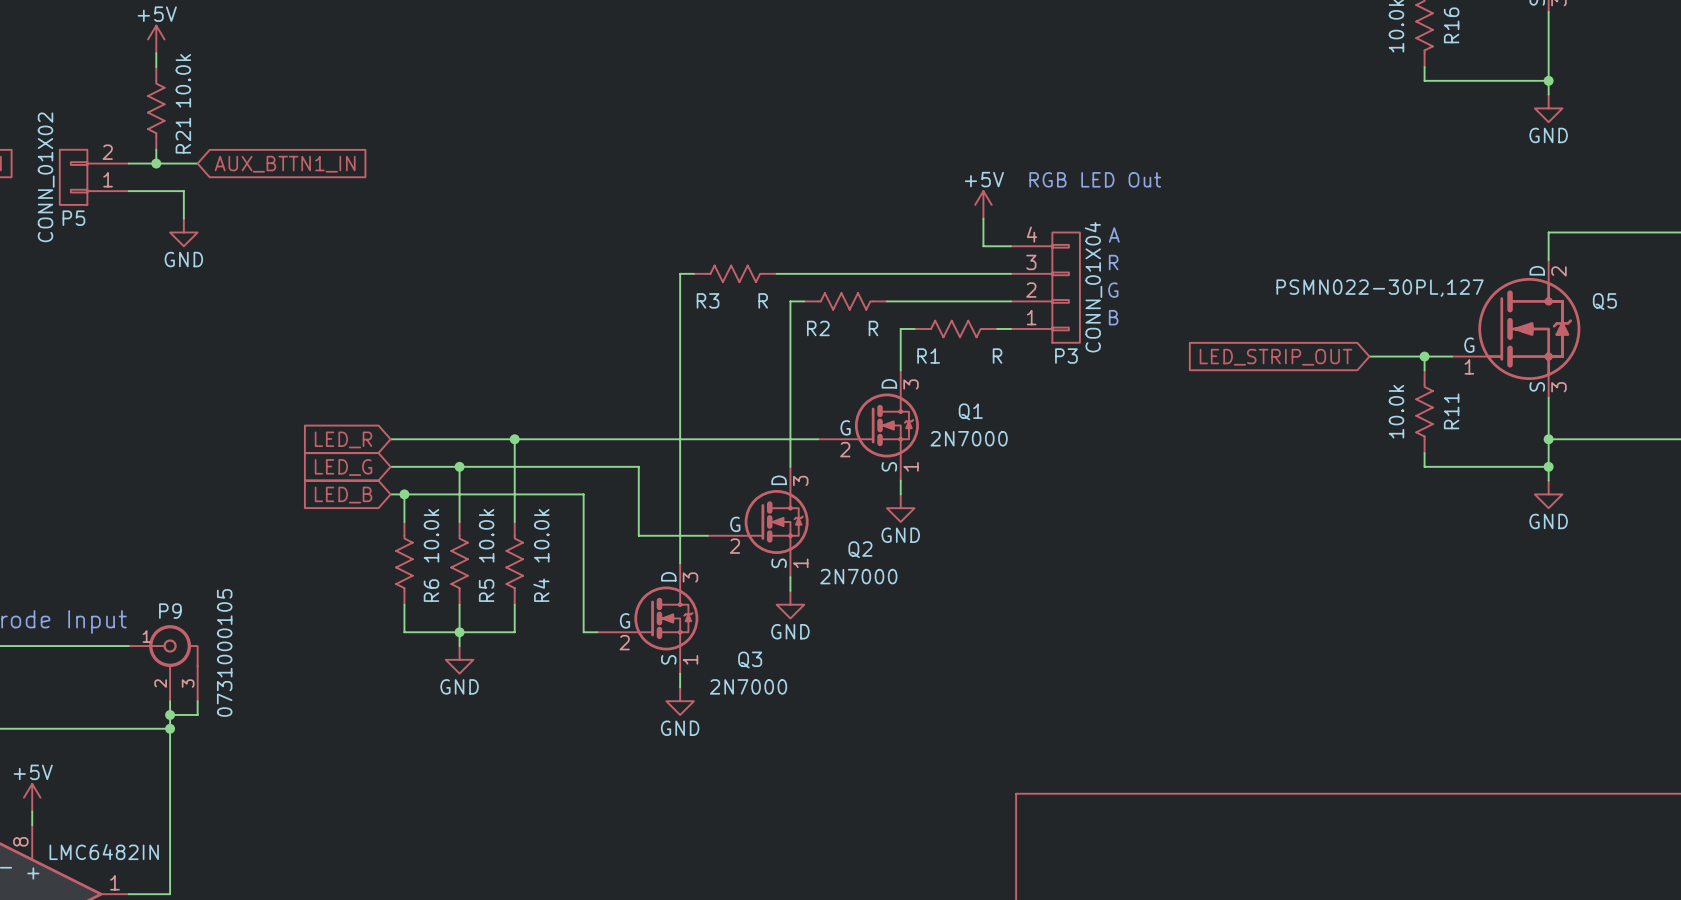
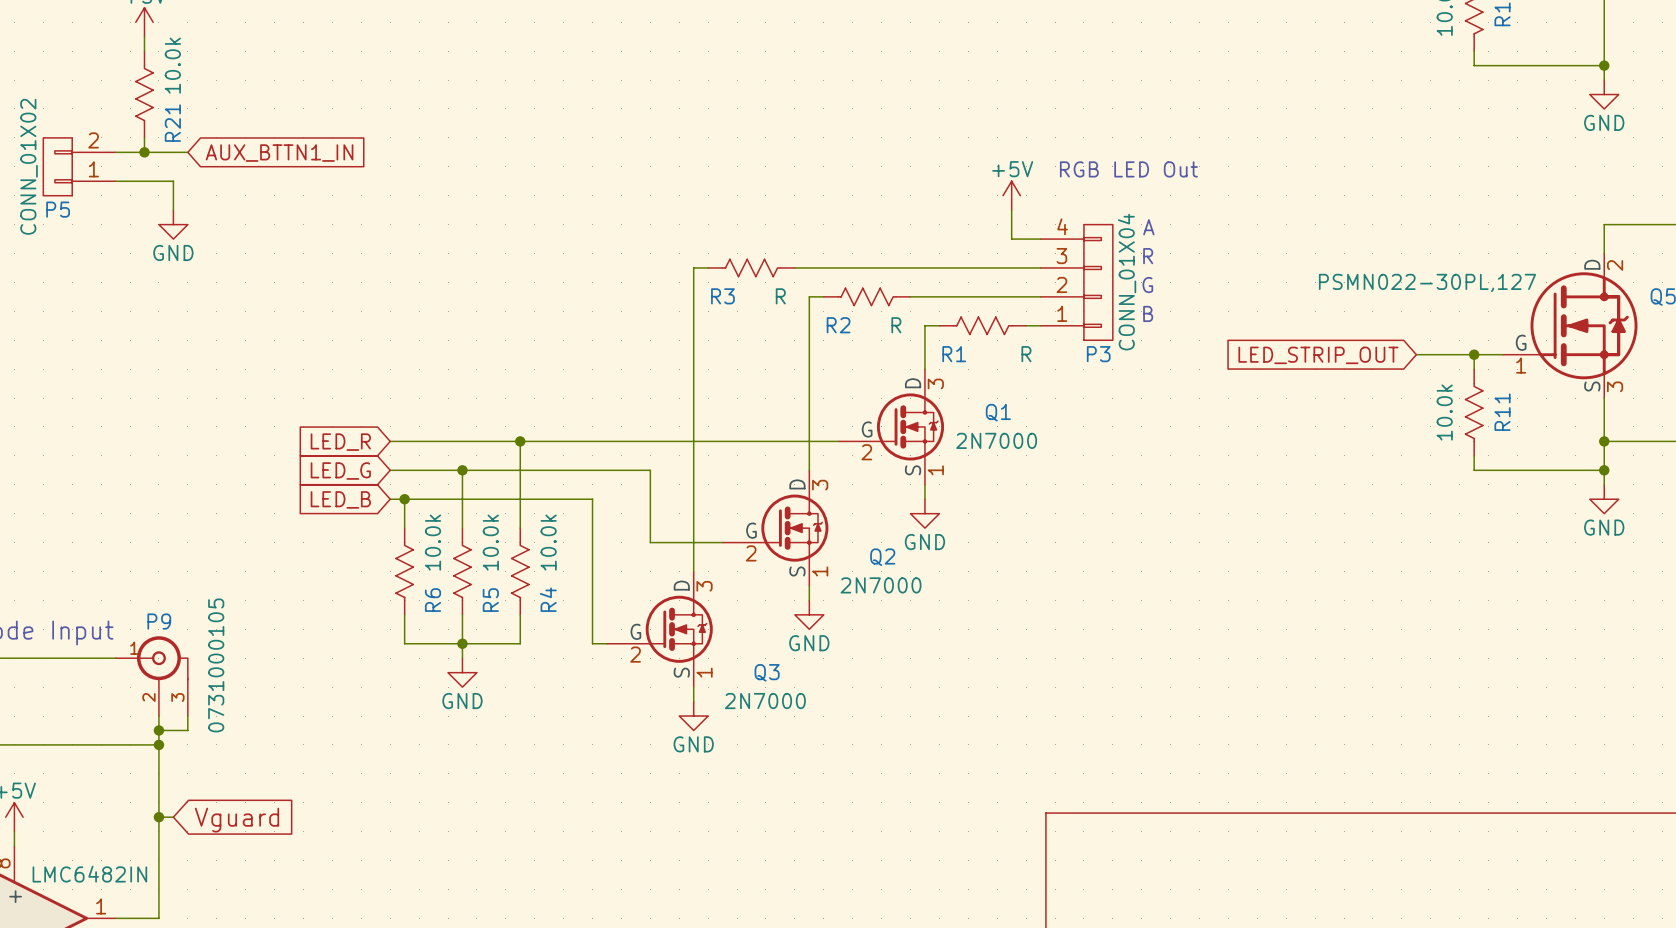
wire: none -> (158, 817) (173, 817)
junction: none -> (158, 817)
global label: none -> Vguard (236, 820)

